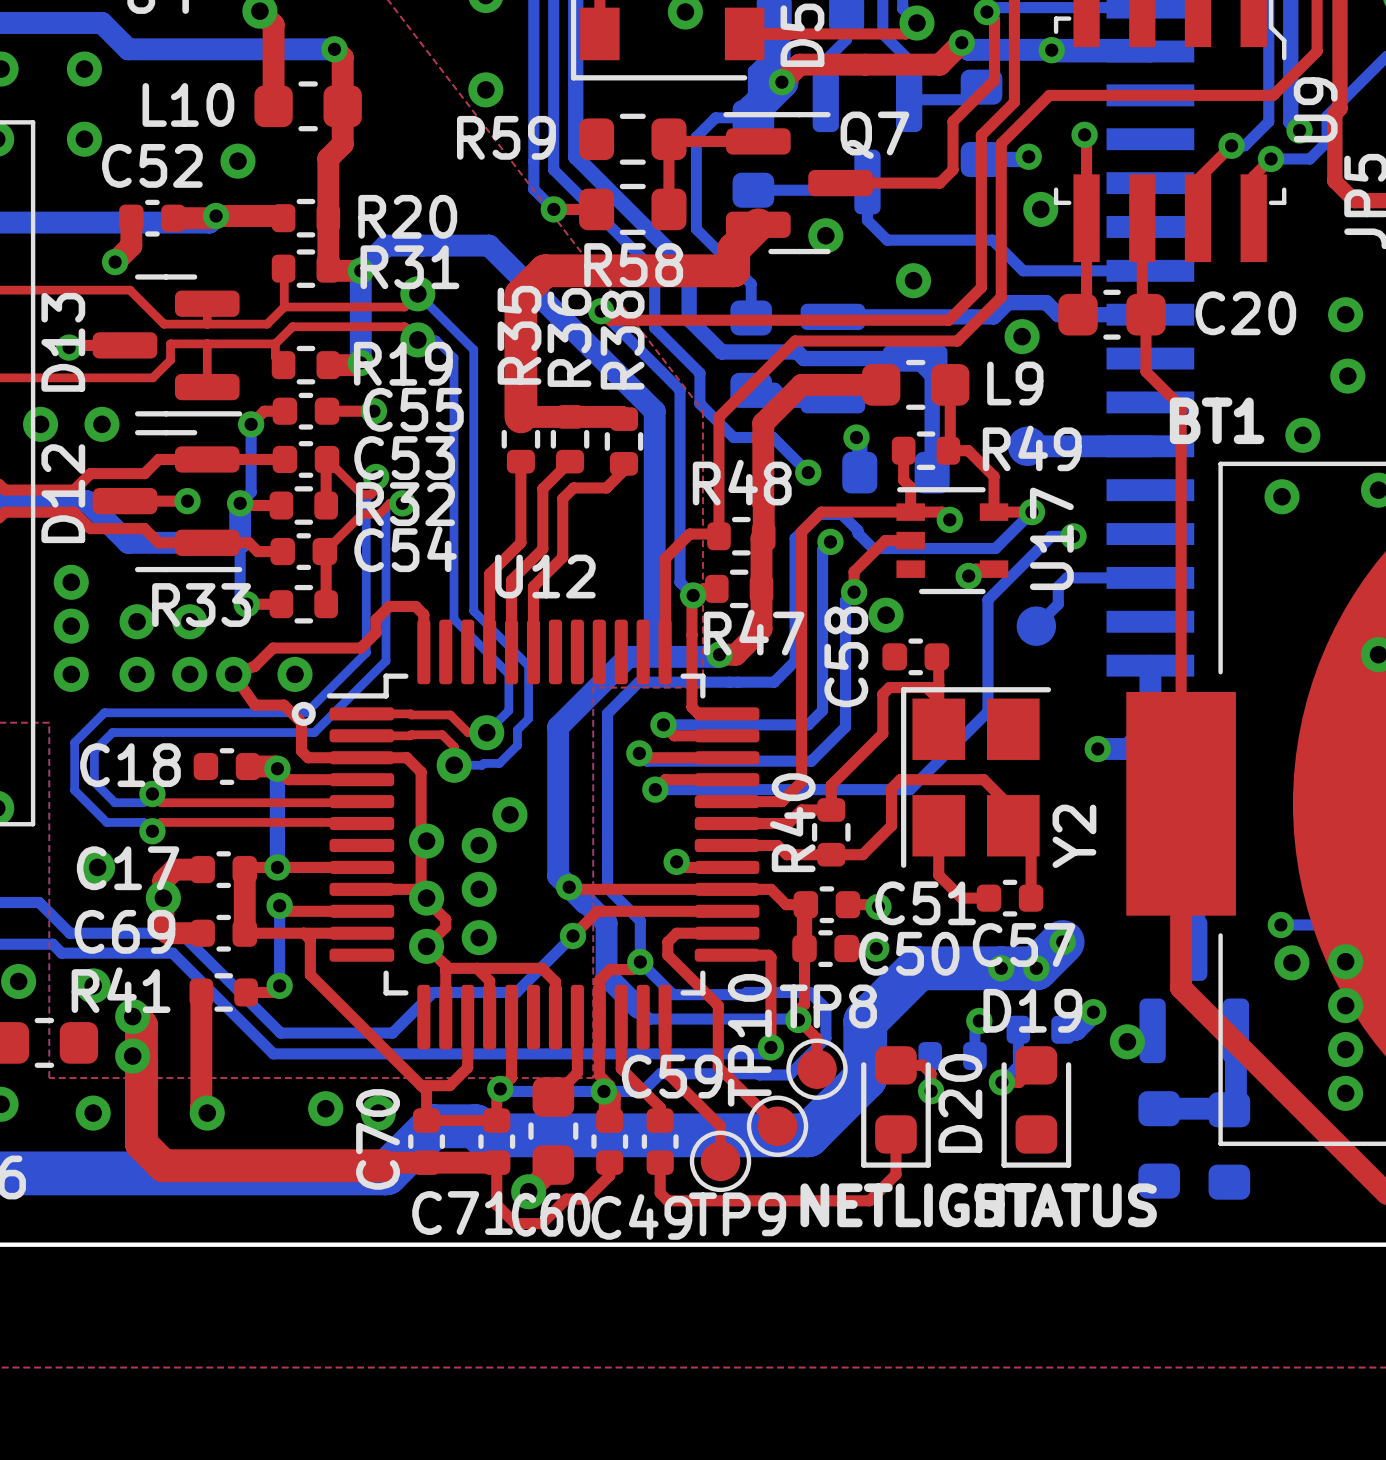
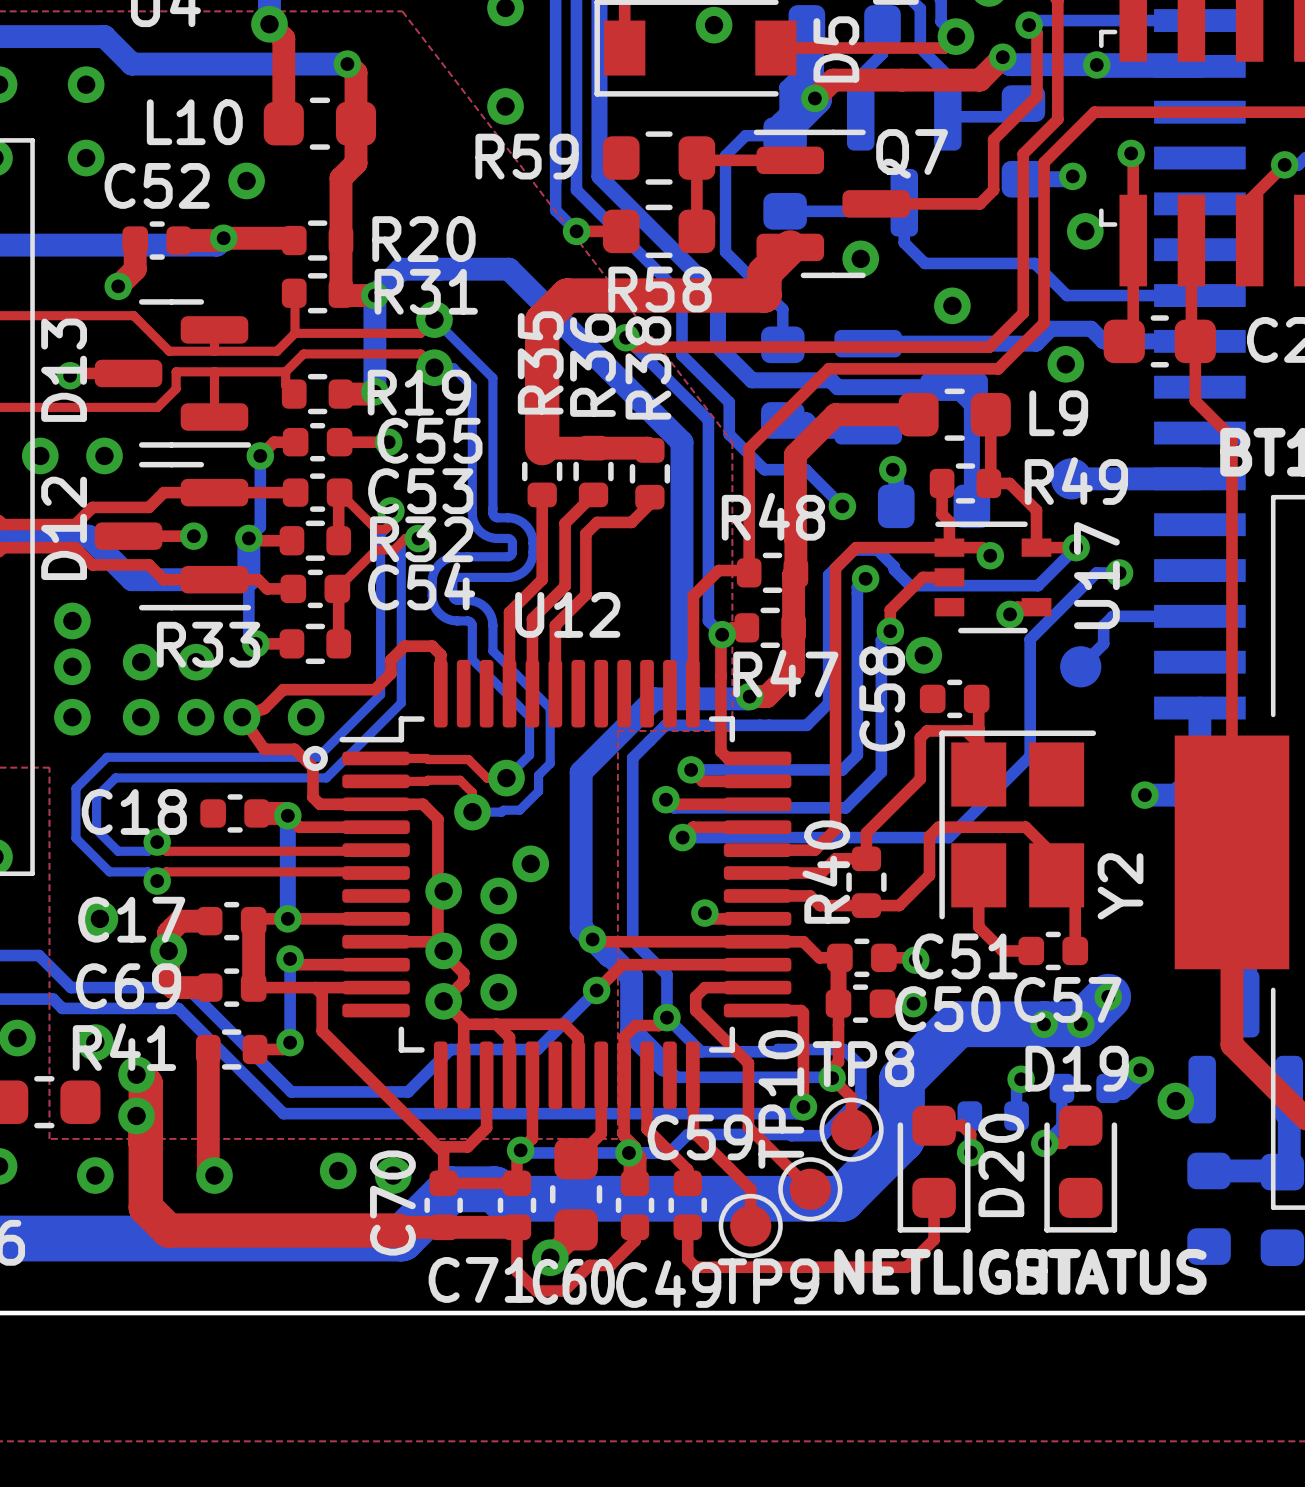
bottom track: (454, 479) (454, 586) -> (472, 513) (474, 524) (481, 532) (491, 537) (509, 538) (512, 543) (512, 553) (509, 556) (451, 557) (441, 562) (434, 571) (432, 579) (432, 595) (436, 609) (446, 618) (468, 621) (472, 625)
bottom track: (473, 479) (473, 586) -> (492, 513) (495, 517) (513, 518) (523, 523) (530, 532) (533, 543) (530, 563) (518, 574) (507, 577) (456, 577) (453, 580) (453, 598) (473, 600) (481, 604) (489, 612) (492, 625)

